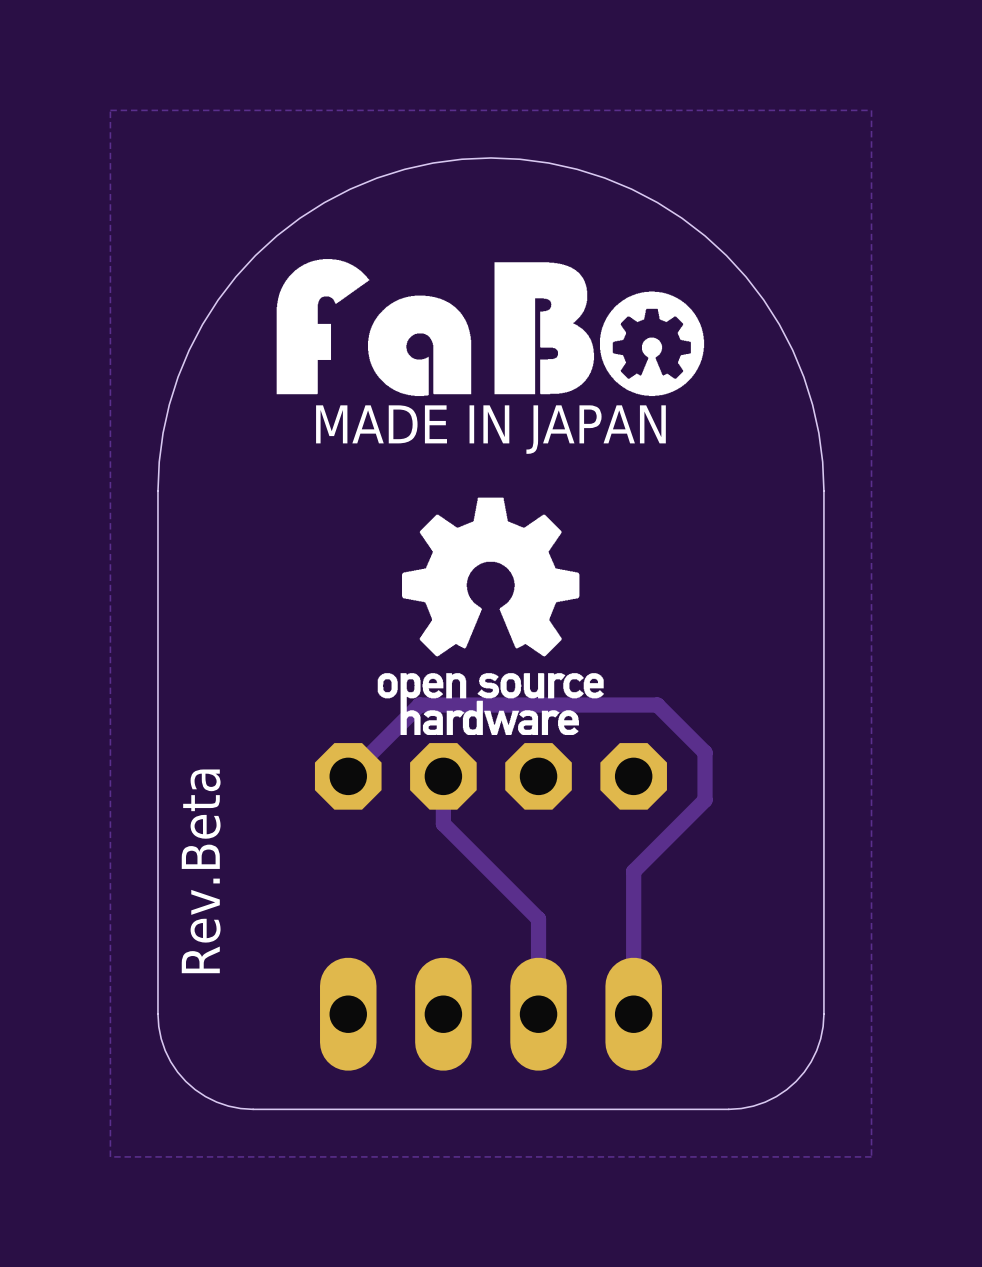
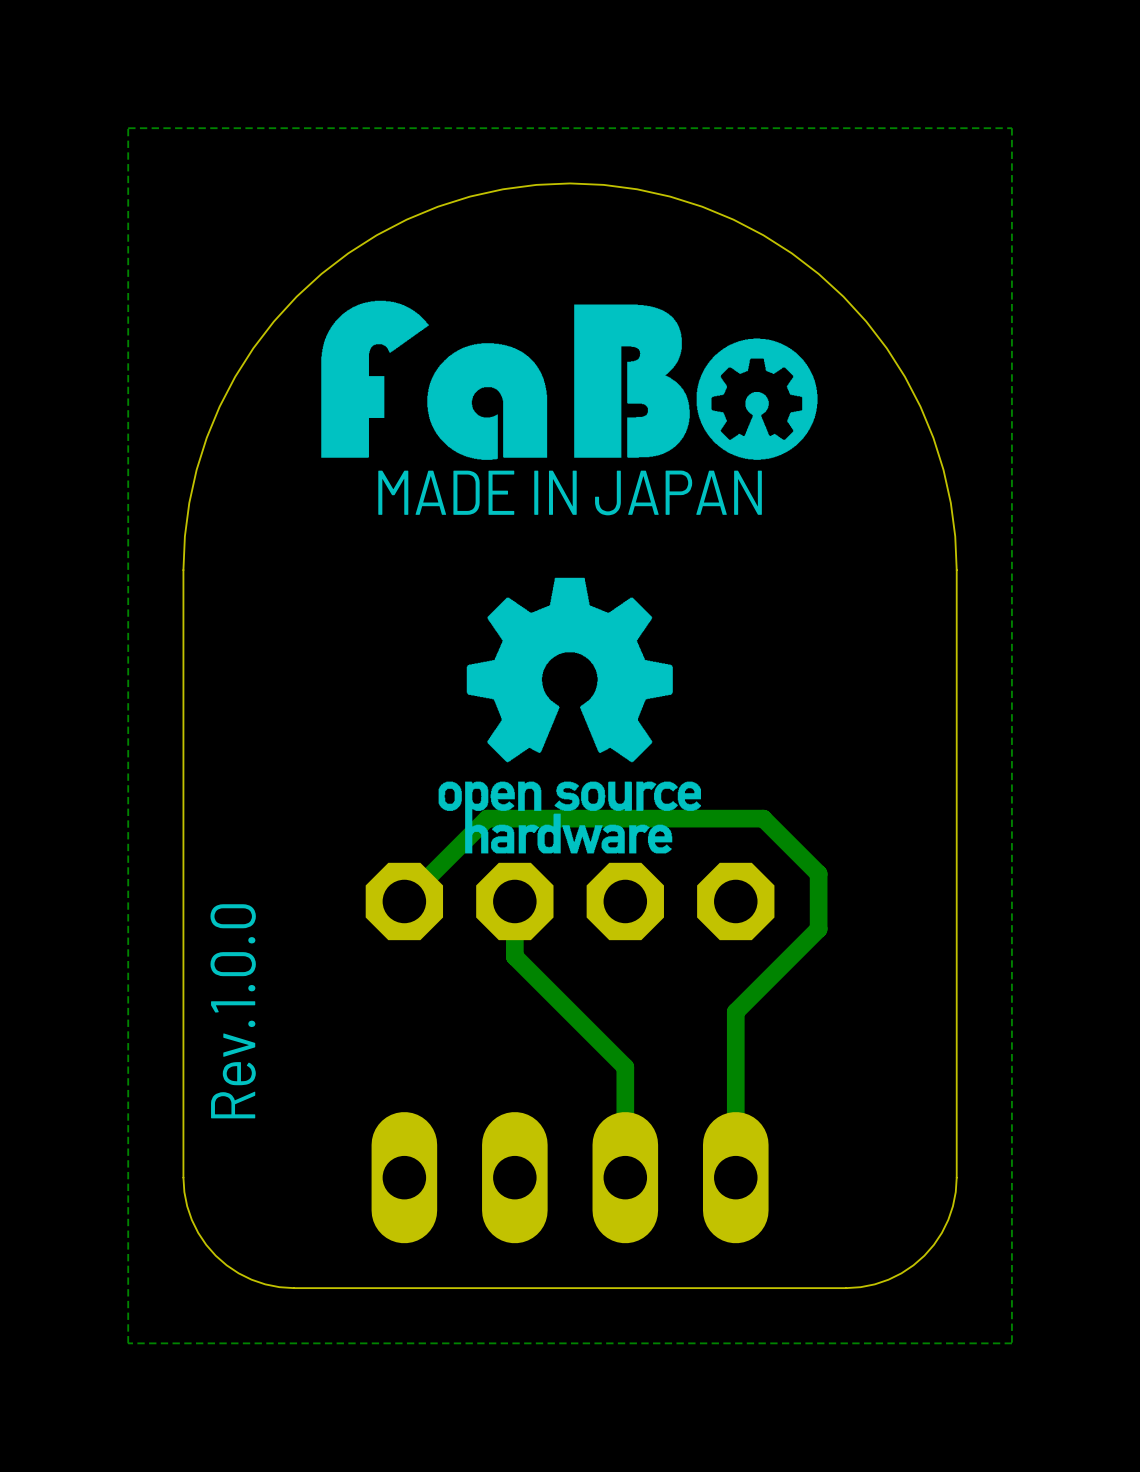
text: Rev.Beta (201, 871) -> Rev.1.0.0 (233, 1011)

